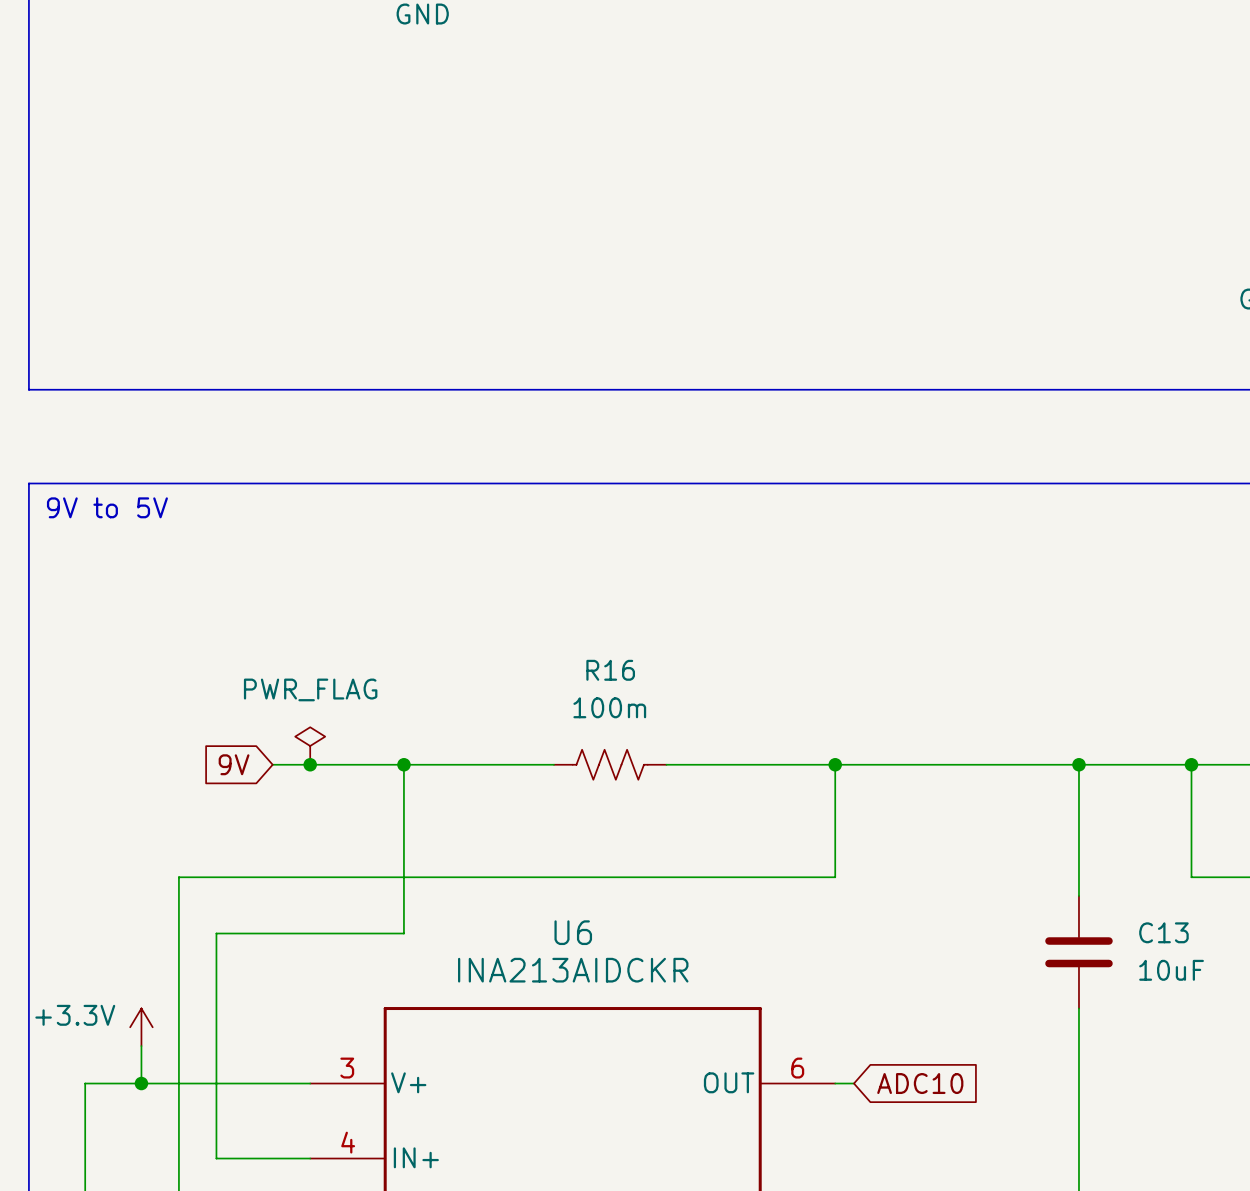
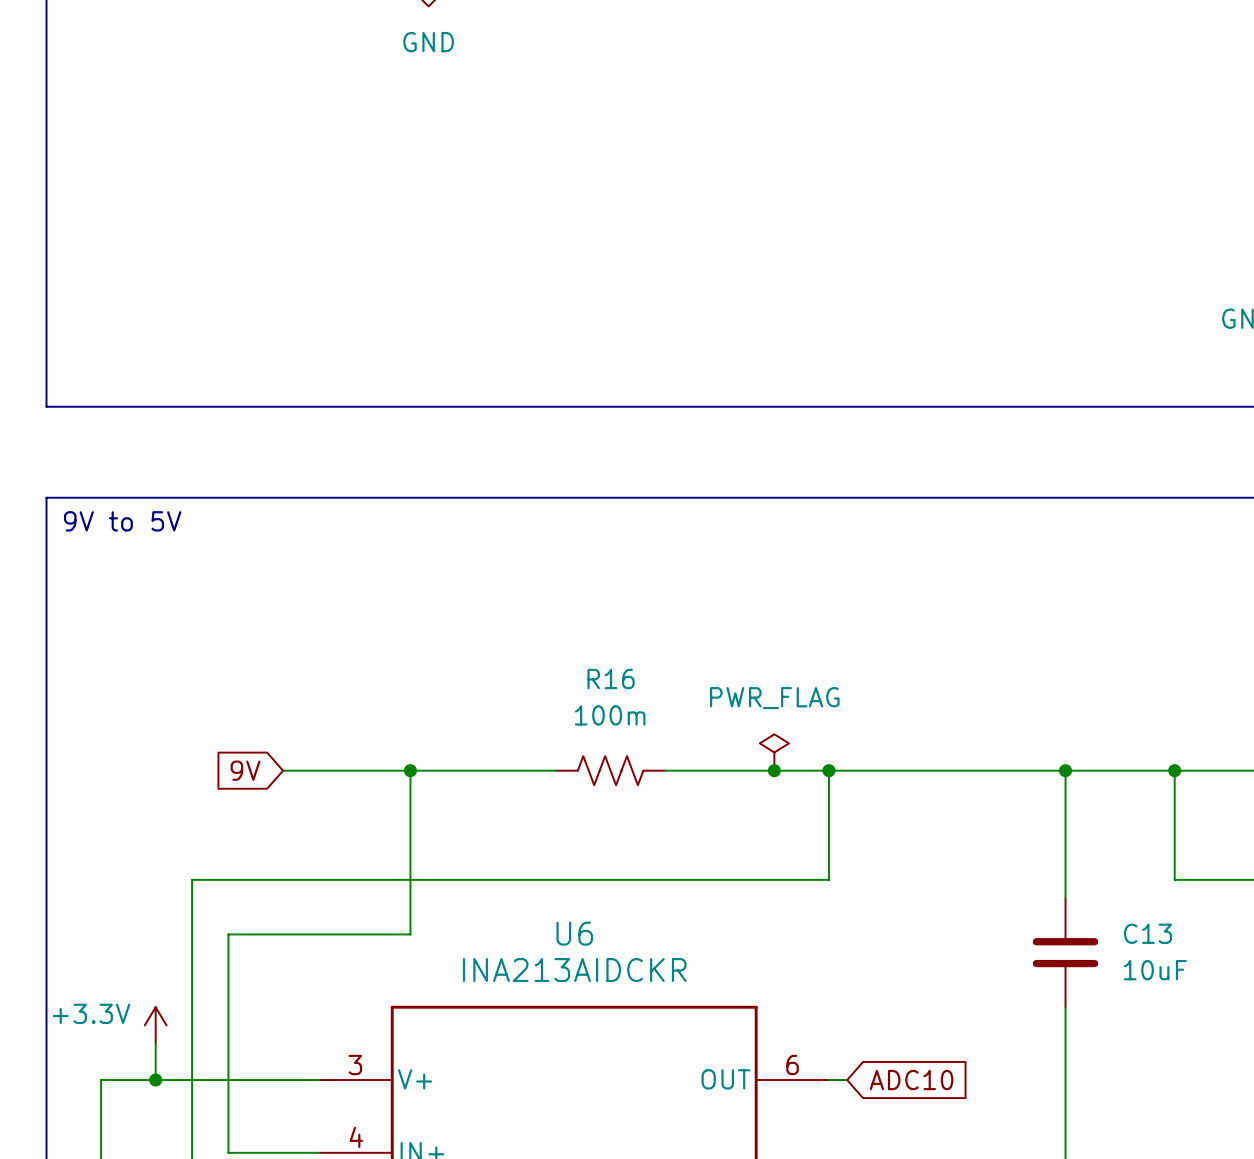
power symbol: PWR_FLAG (310, 746) -> none
power symbol: none -> PWR_FLAG (774, 752)
junction: (310, 764) -> none
junction: none -> (774, 770)

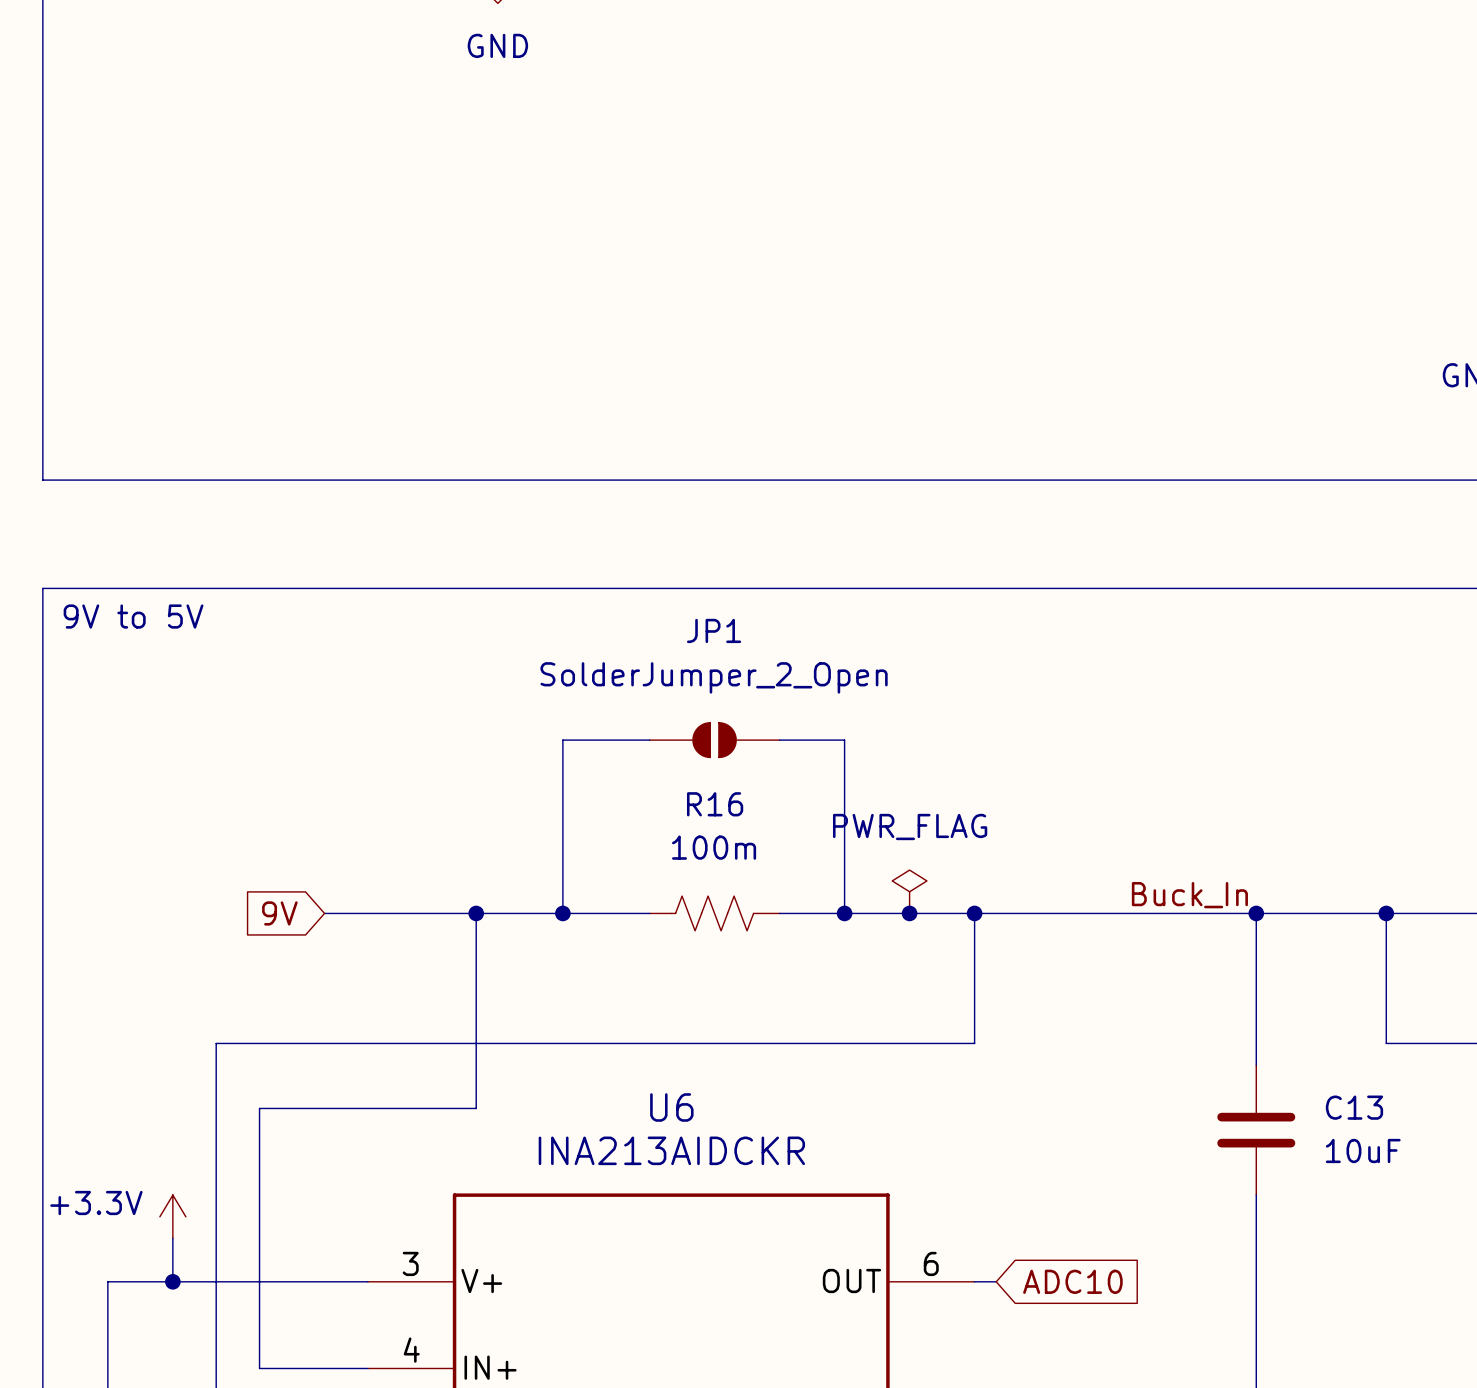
wire: none -> (649, 740) (562, 740) (562, 913)
JP1: none -> SolderJumper_2_Open (714, 740)
wire: none -> (779, 740) (844, 740) (844, 913)
label: none -> Buck_In (1189, 895)
junction: none -> (562, 913)
junction: none -> (844, 913)

